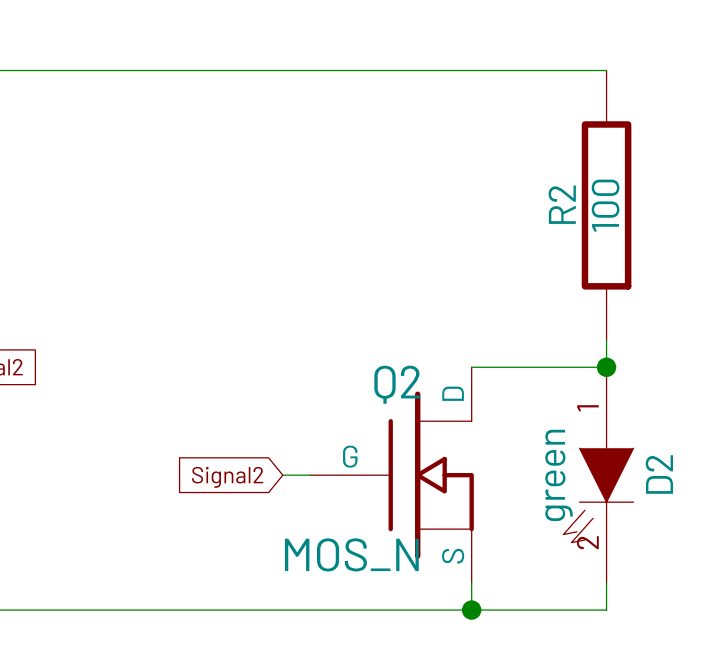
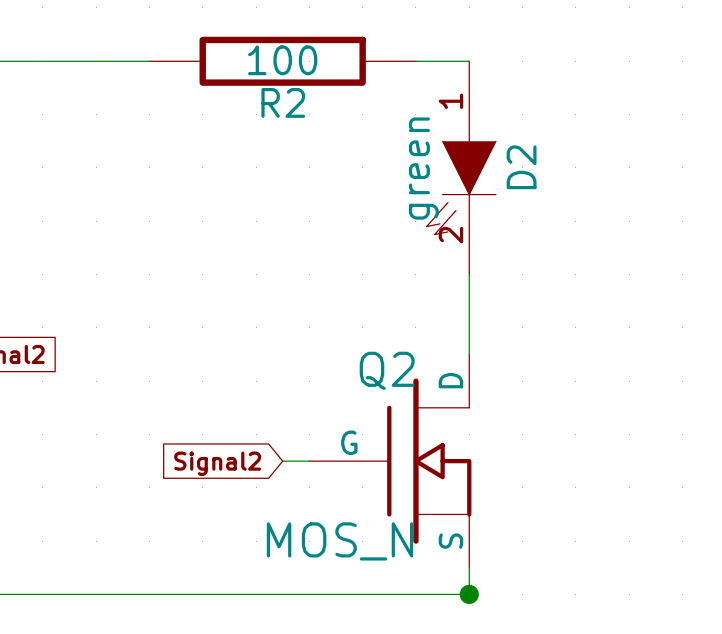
wire: (147, 70) (417, 70) -> none
wire: (471, 70) (606, 70) -> none
R2 name position: R2 (562, 204) -> R2 (283, 102)
R2 rotation: 0° (606, 205) -> 90° clockwise (282, 61)
R2 position: (606, 205) -> (282, 61)
wire: (606, 340) (606, 367) (471, 367) -> (469, 274) (469, 354)
junction: (606, 367) -> none
D2 position: (598, 475) -> (461, 167)
wire: (606, 583) (606, 610) (471, 610) -> none

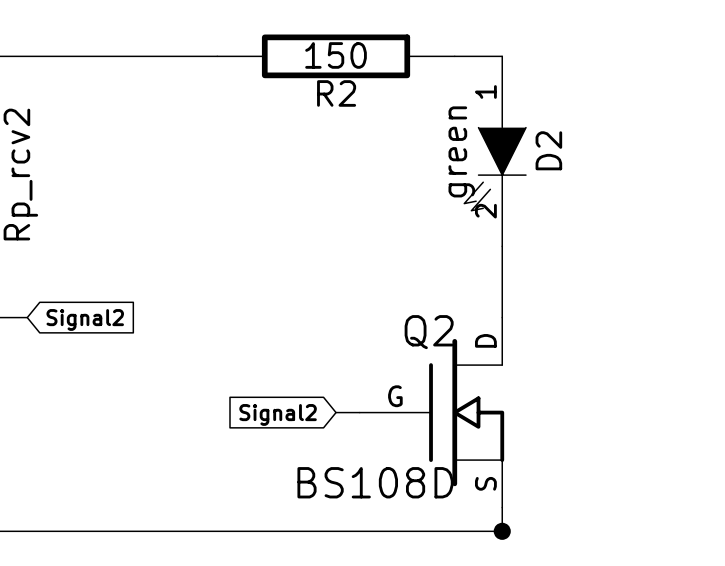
R2 value: 100 (282, 60) -> 150 (336, 55)
Q2 value: MOS_N (339, 541) -> BS108D (375, 482)

